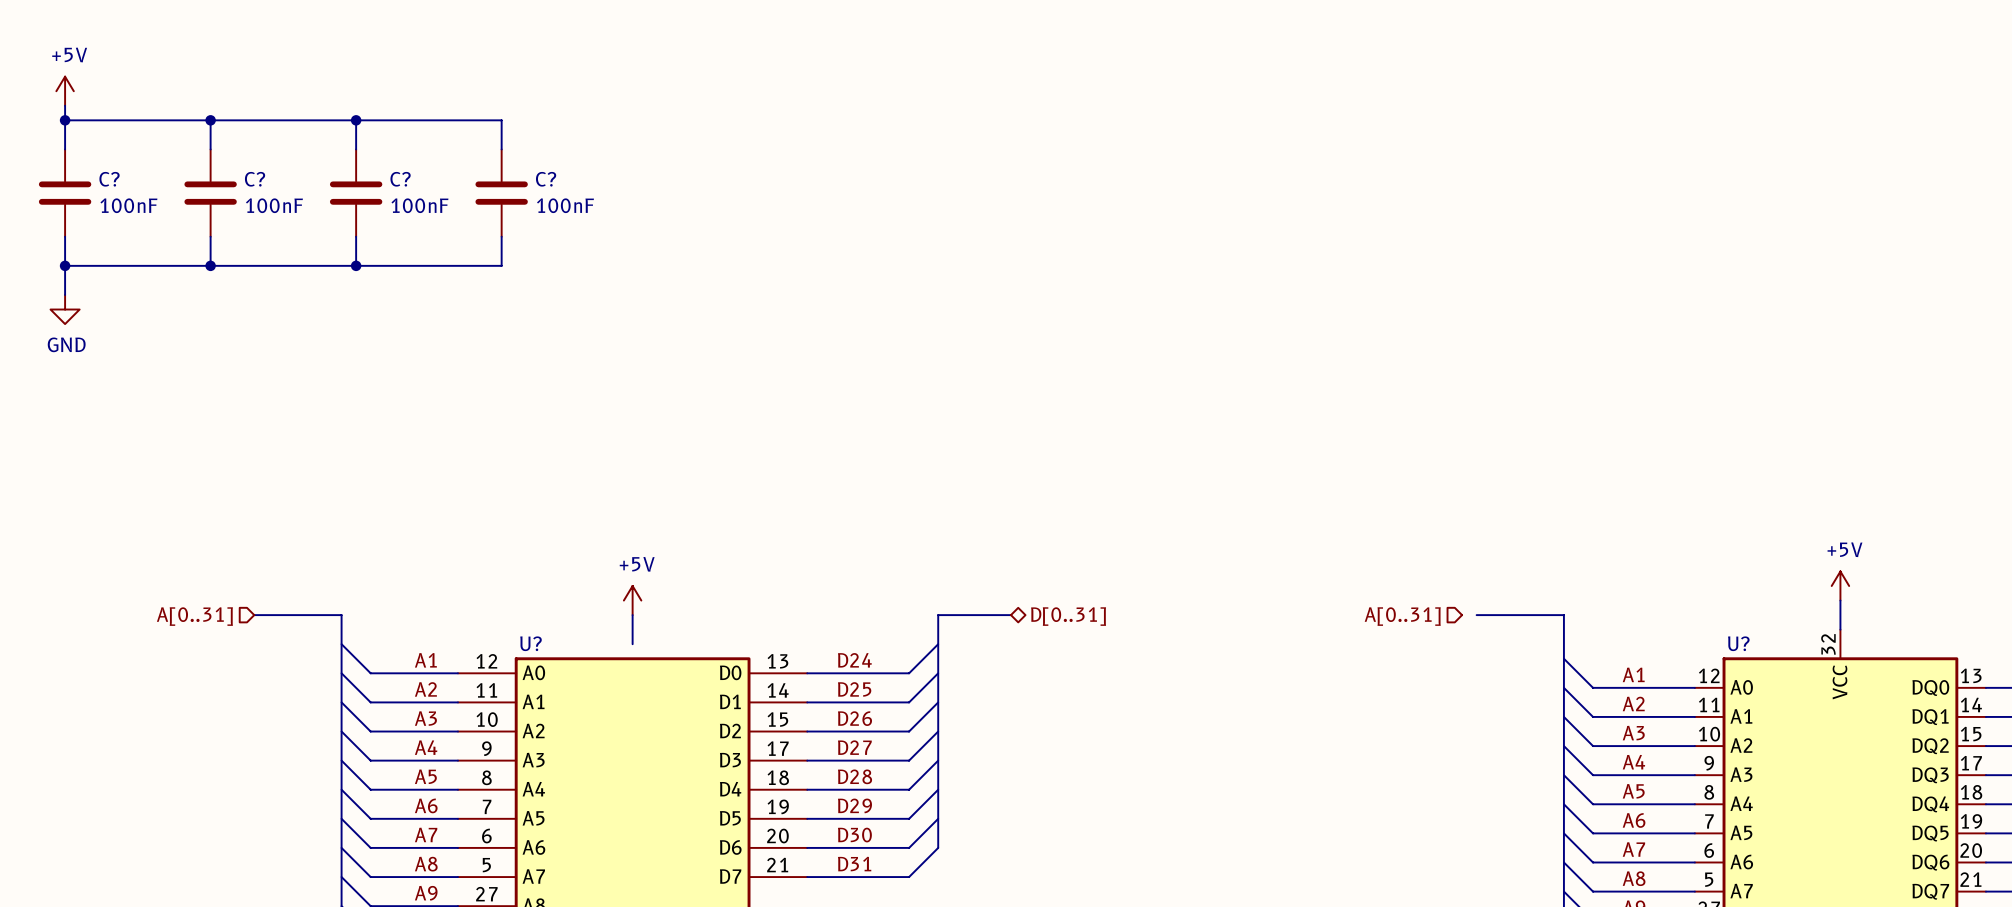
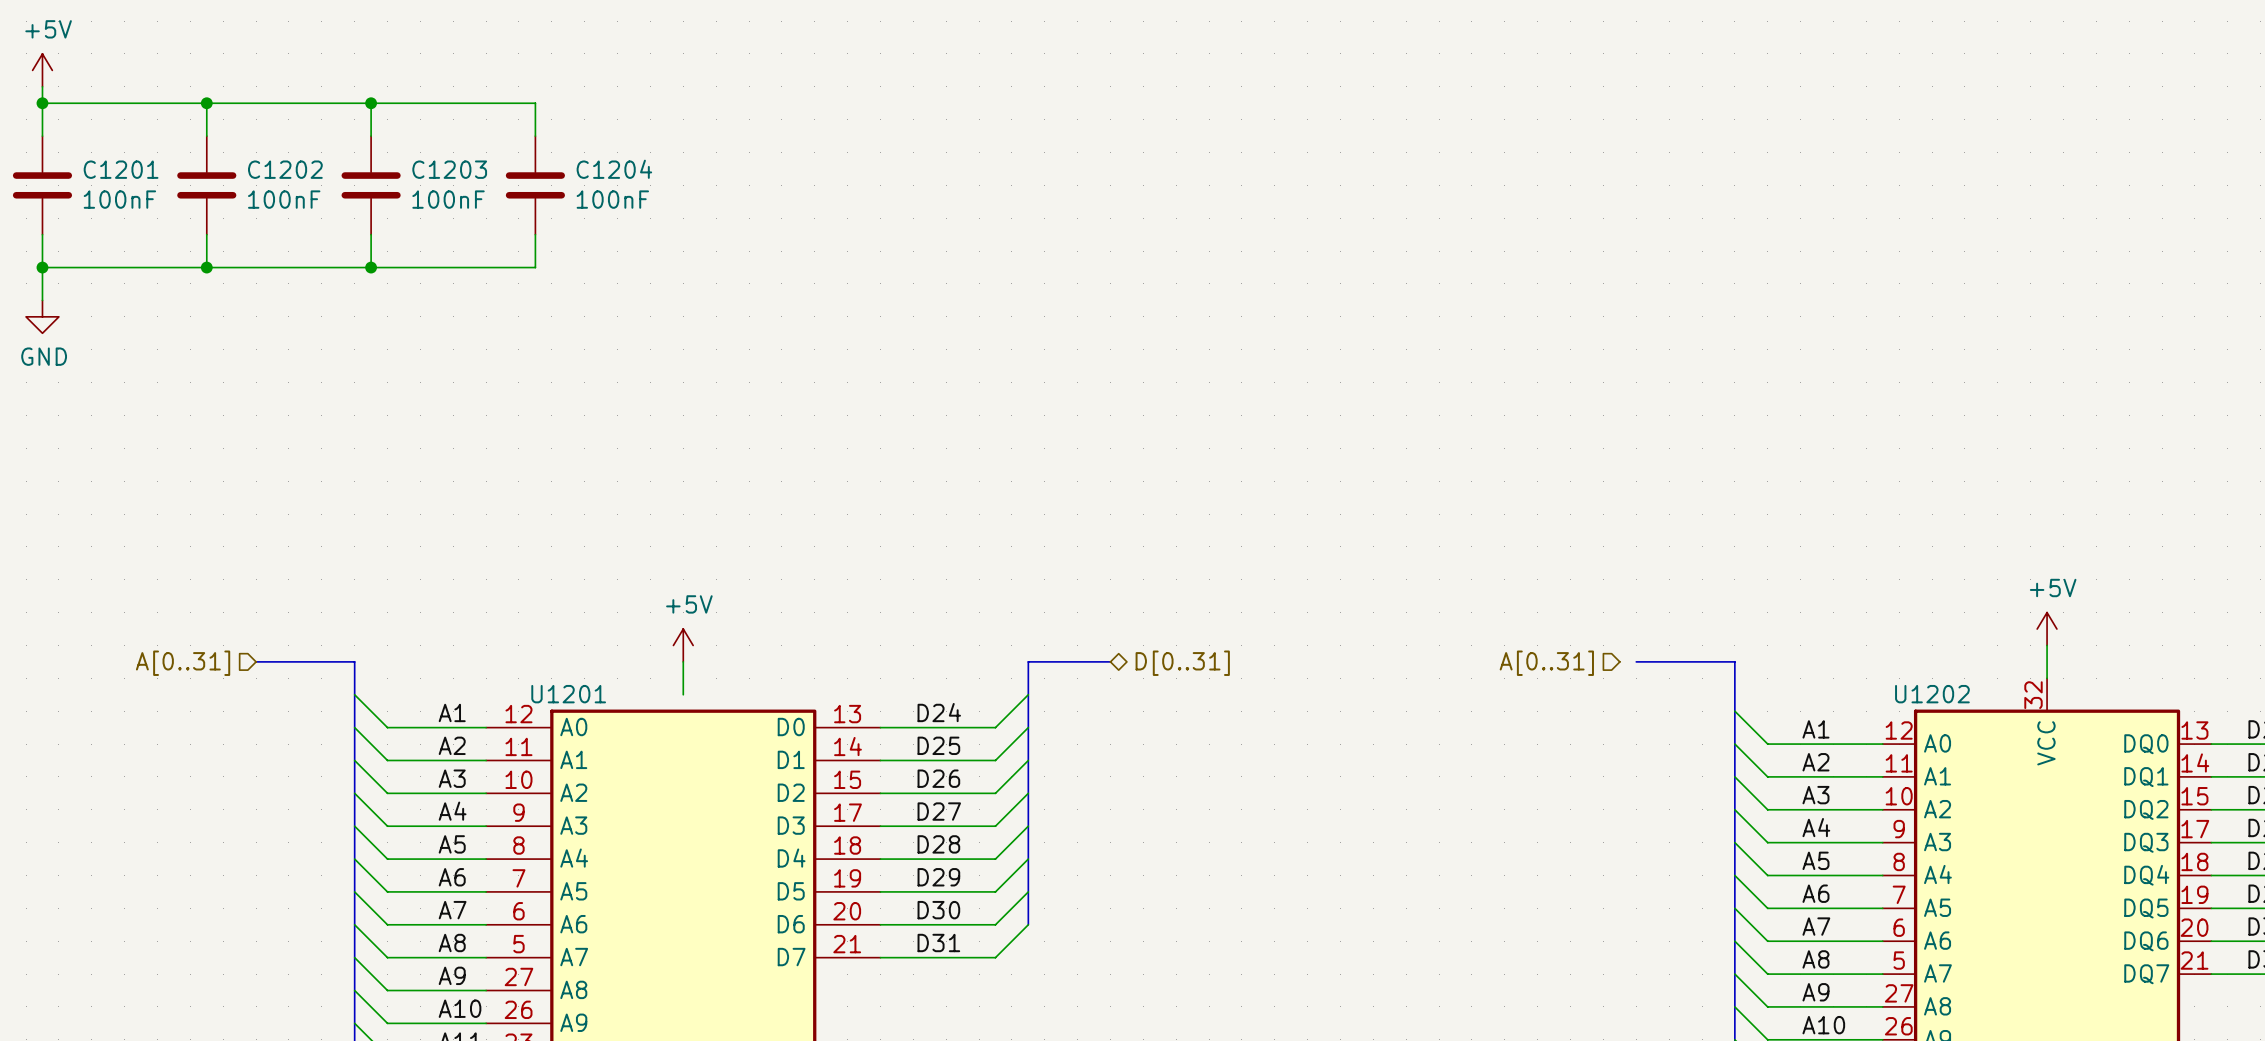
C? name: C? (109, 179) -> C1201 (121, 169)
C? name: C? (255, 179) -> C1202 (285, 169)
C? name: C? (400, 179) -> C1203 (449, 169)
C? name: C? (546, 179) -> C1204 (614, 169)
U? name: U? (530, 643) -> U1201 (568, 694)
U? name: U? (1738, 643) -> U1202 (1932, 694)

